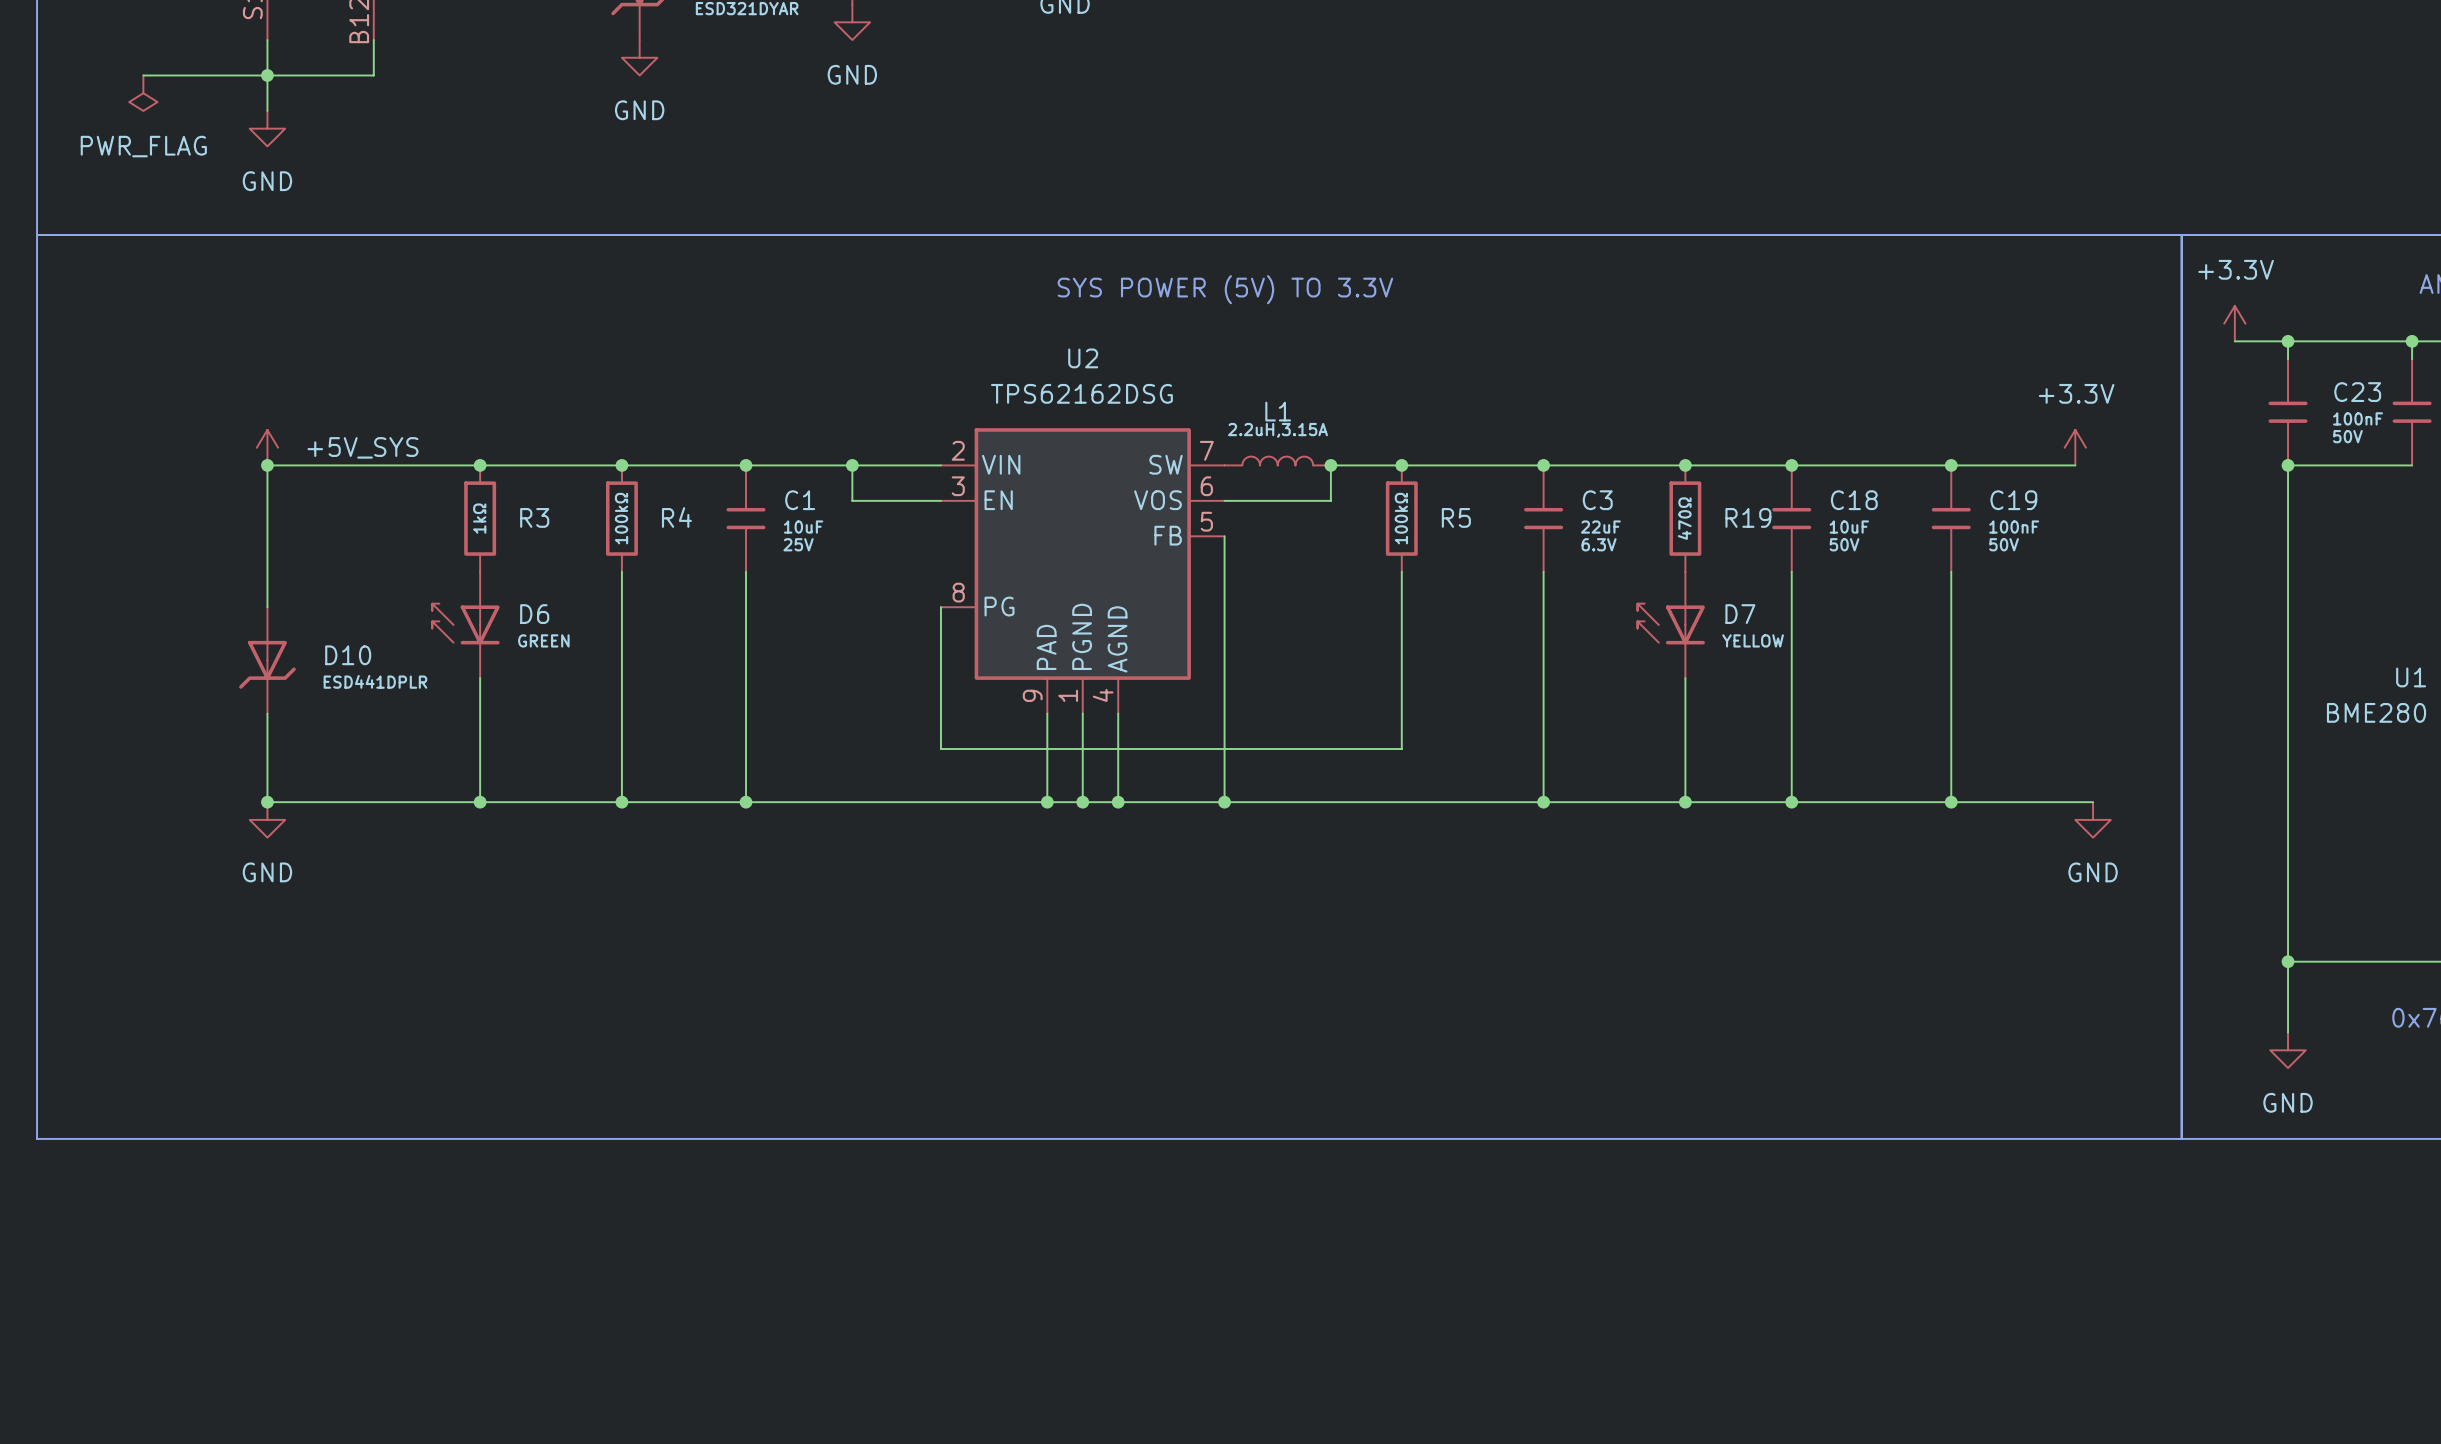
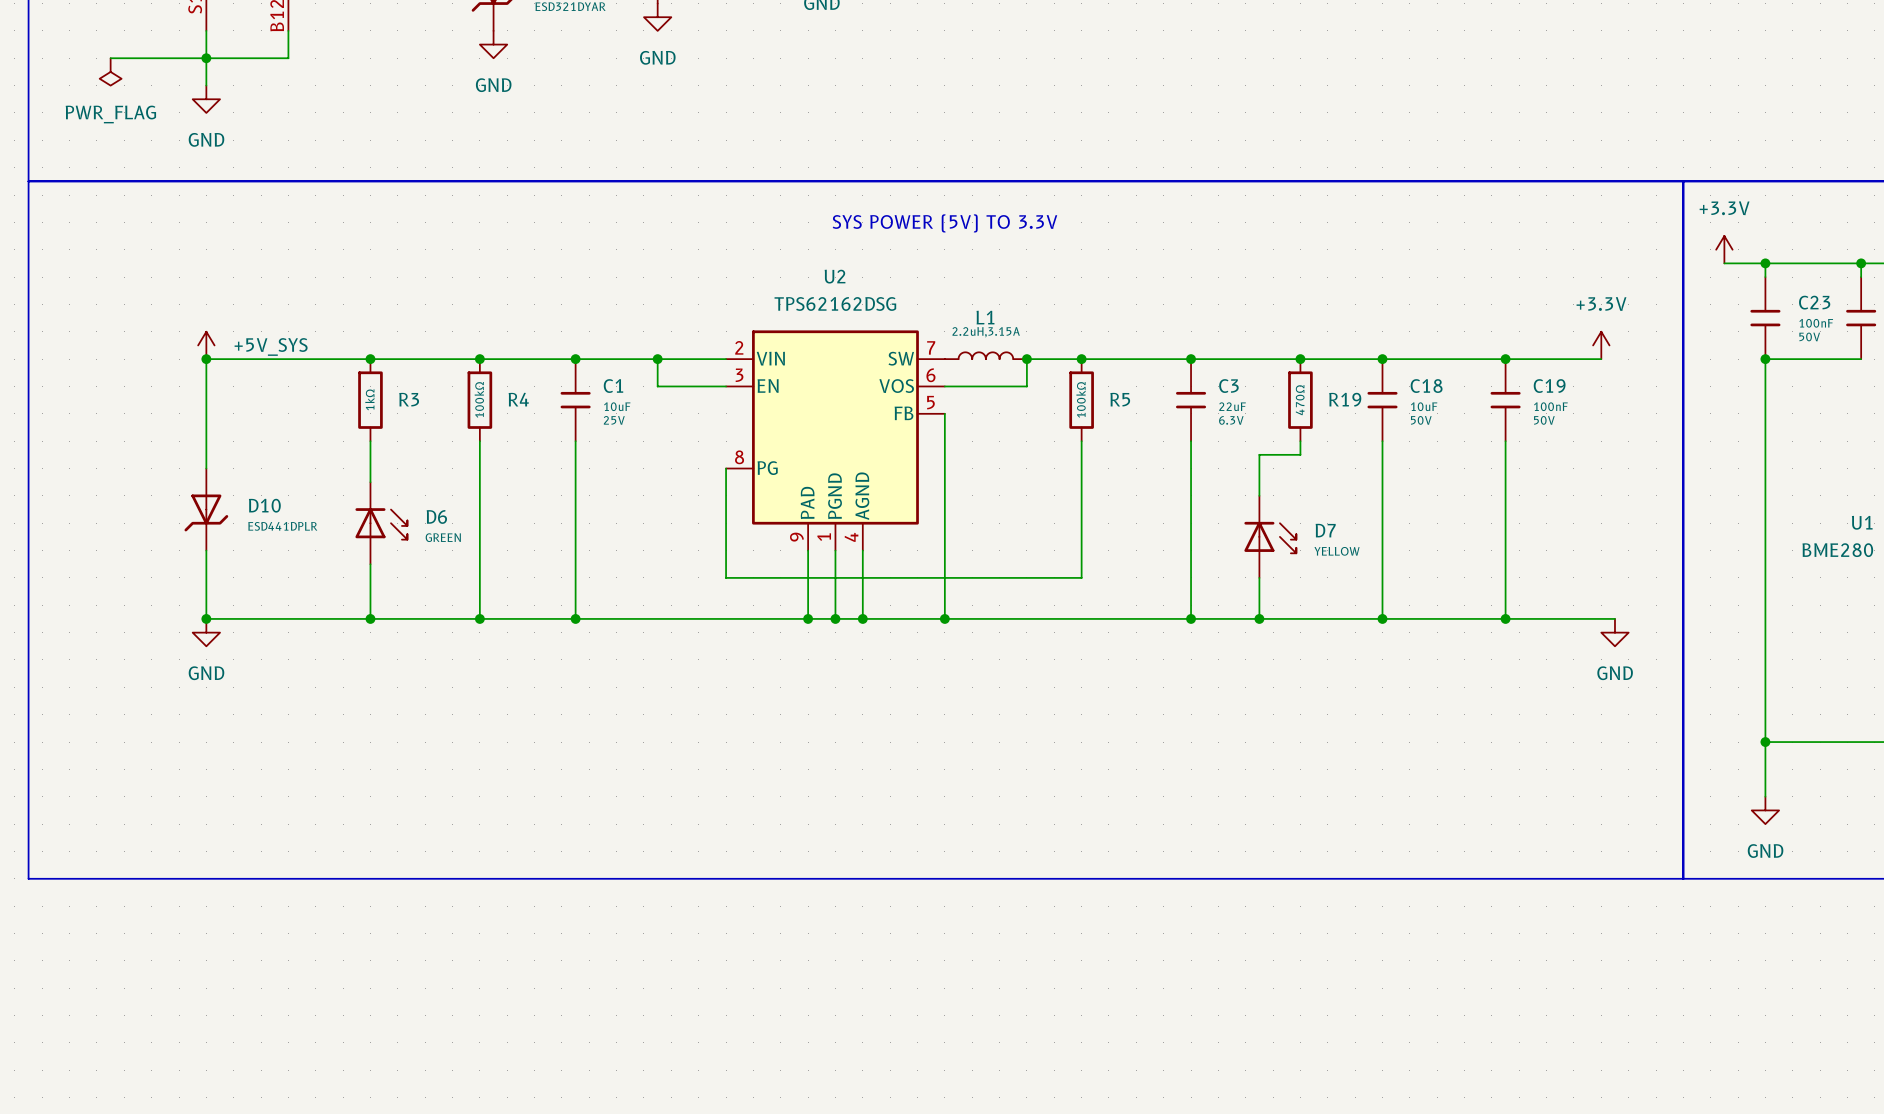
wire: none -> (1300, 441) (1300, 454) (1259, 454) (1259, 495)
D6 rotation: 0° (465, 623) -> 180° (381, 524)
D7 rotation: 0° (1670, 623) -> 180° (1270, 537)
D7 position: (1670, 624) -> (1270, 536)
wire: (1685, 678) (1685, 802) -> none
wire: none -> (1259, 577) (1259, 618)
junction position: (1685, 802) -> (1259, 618)

